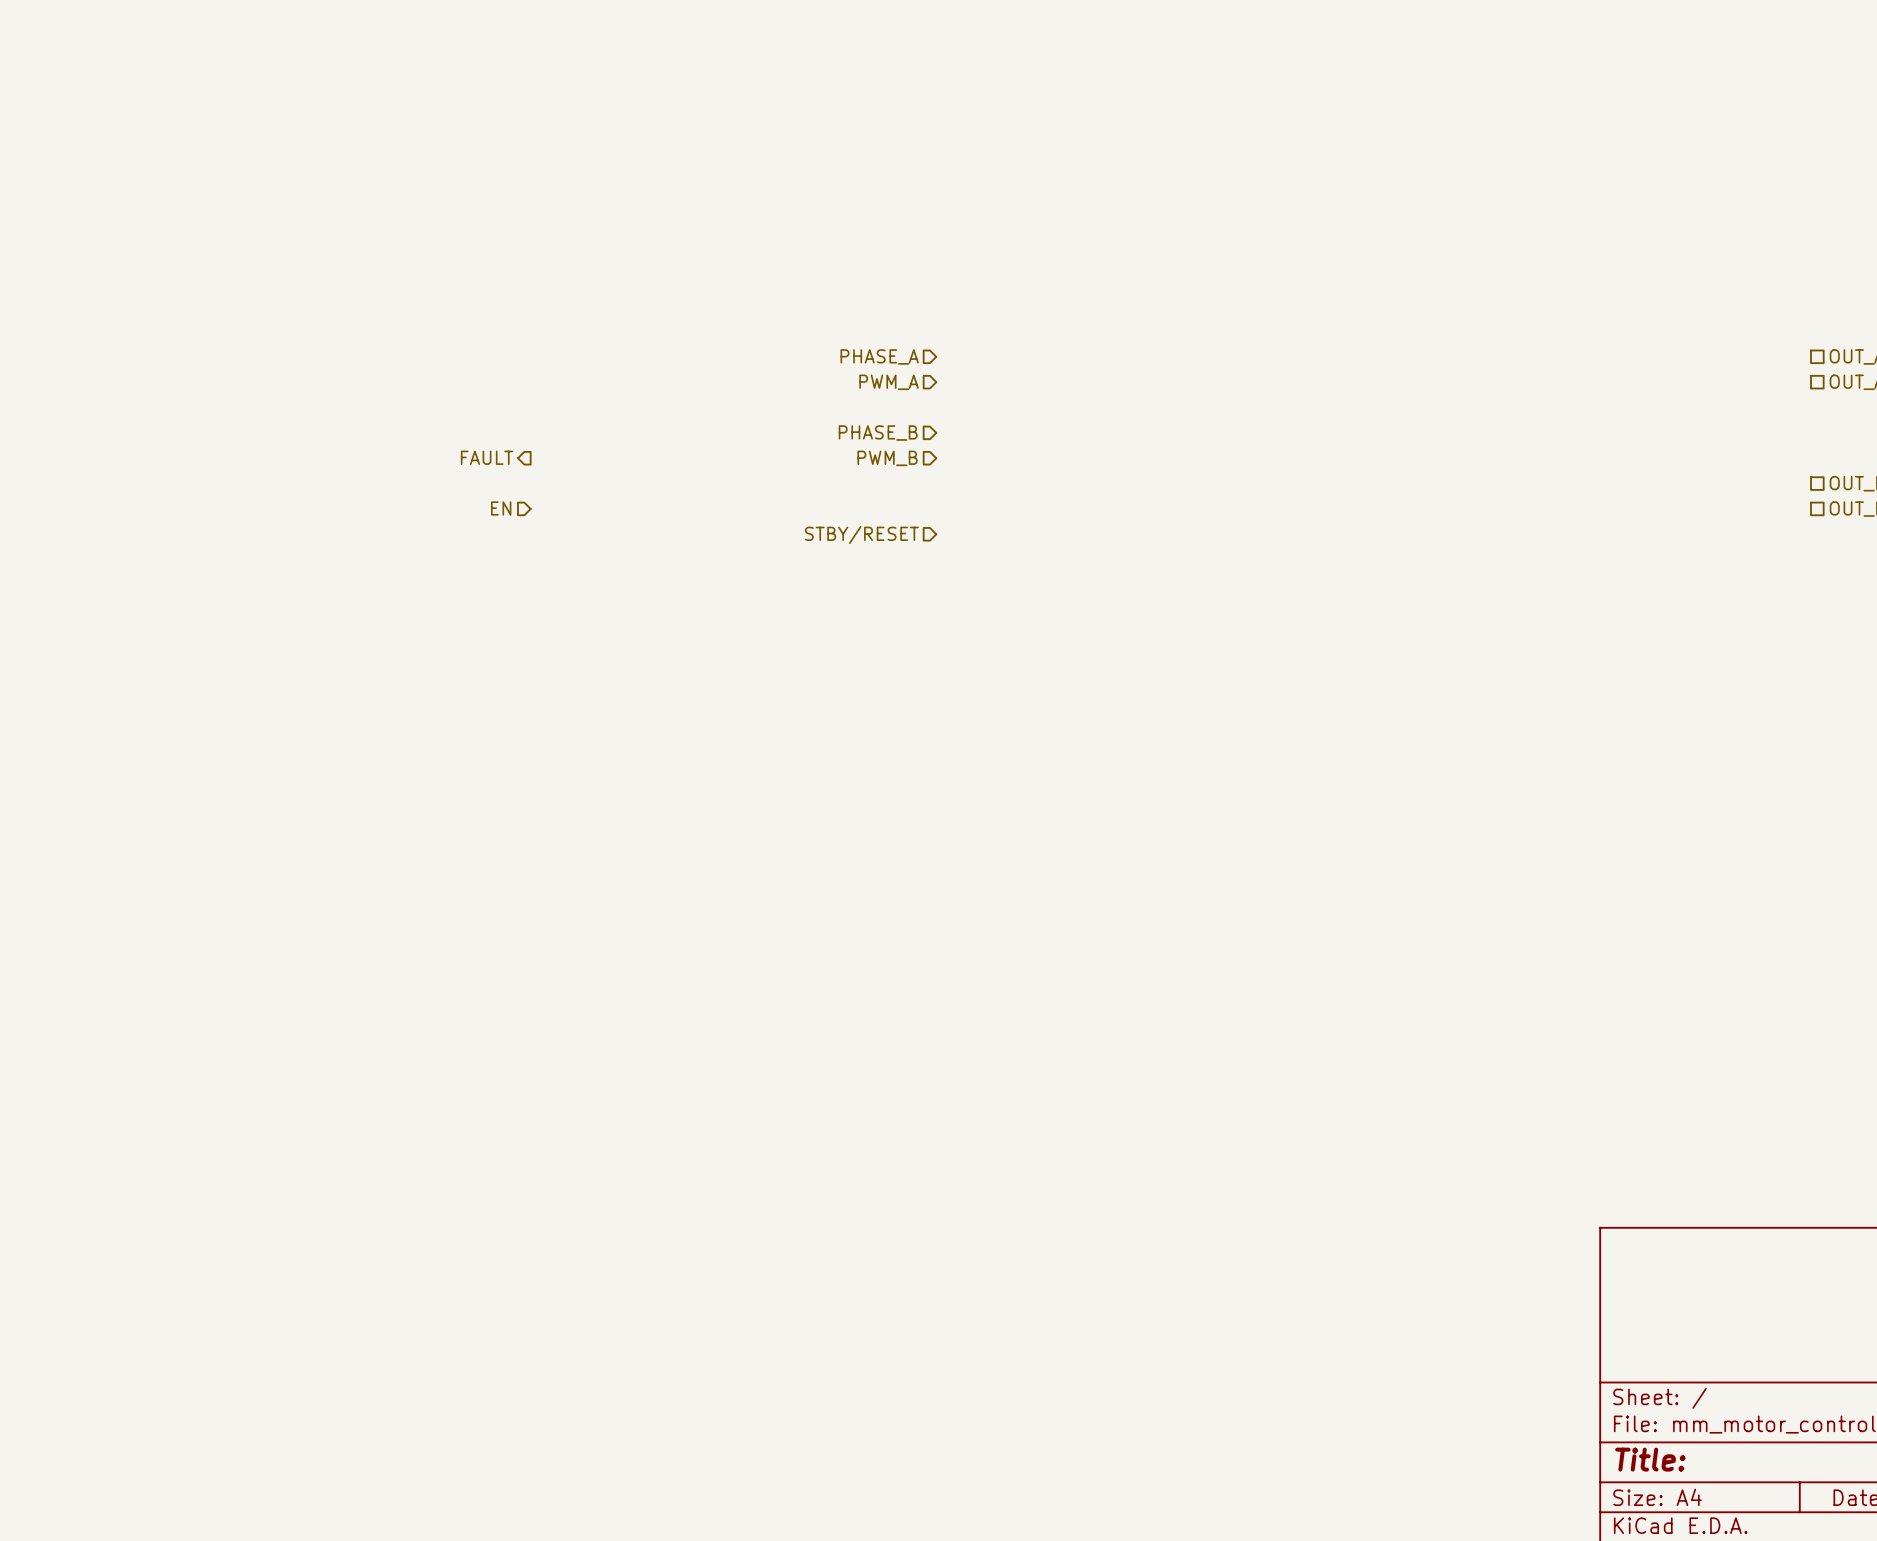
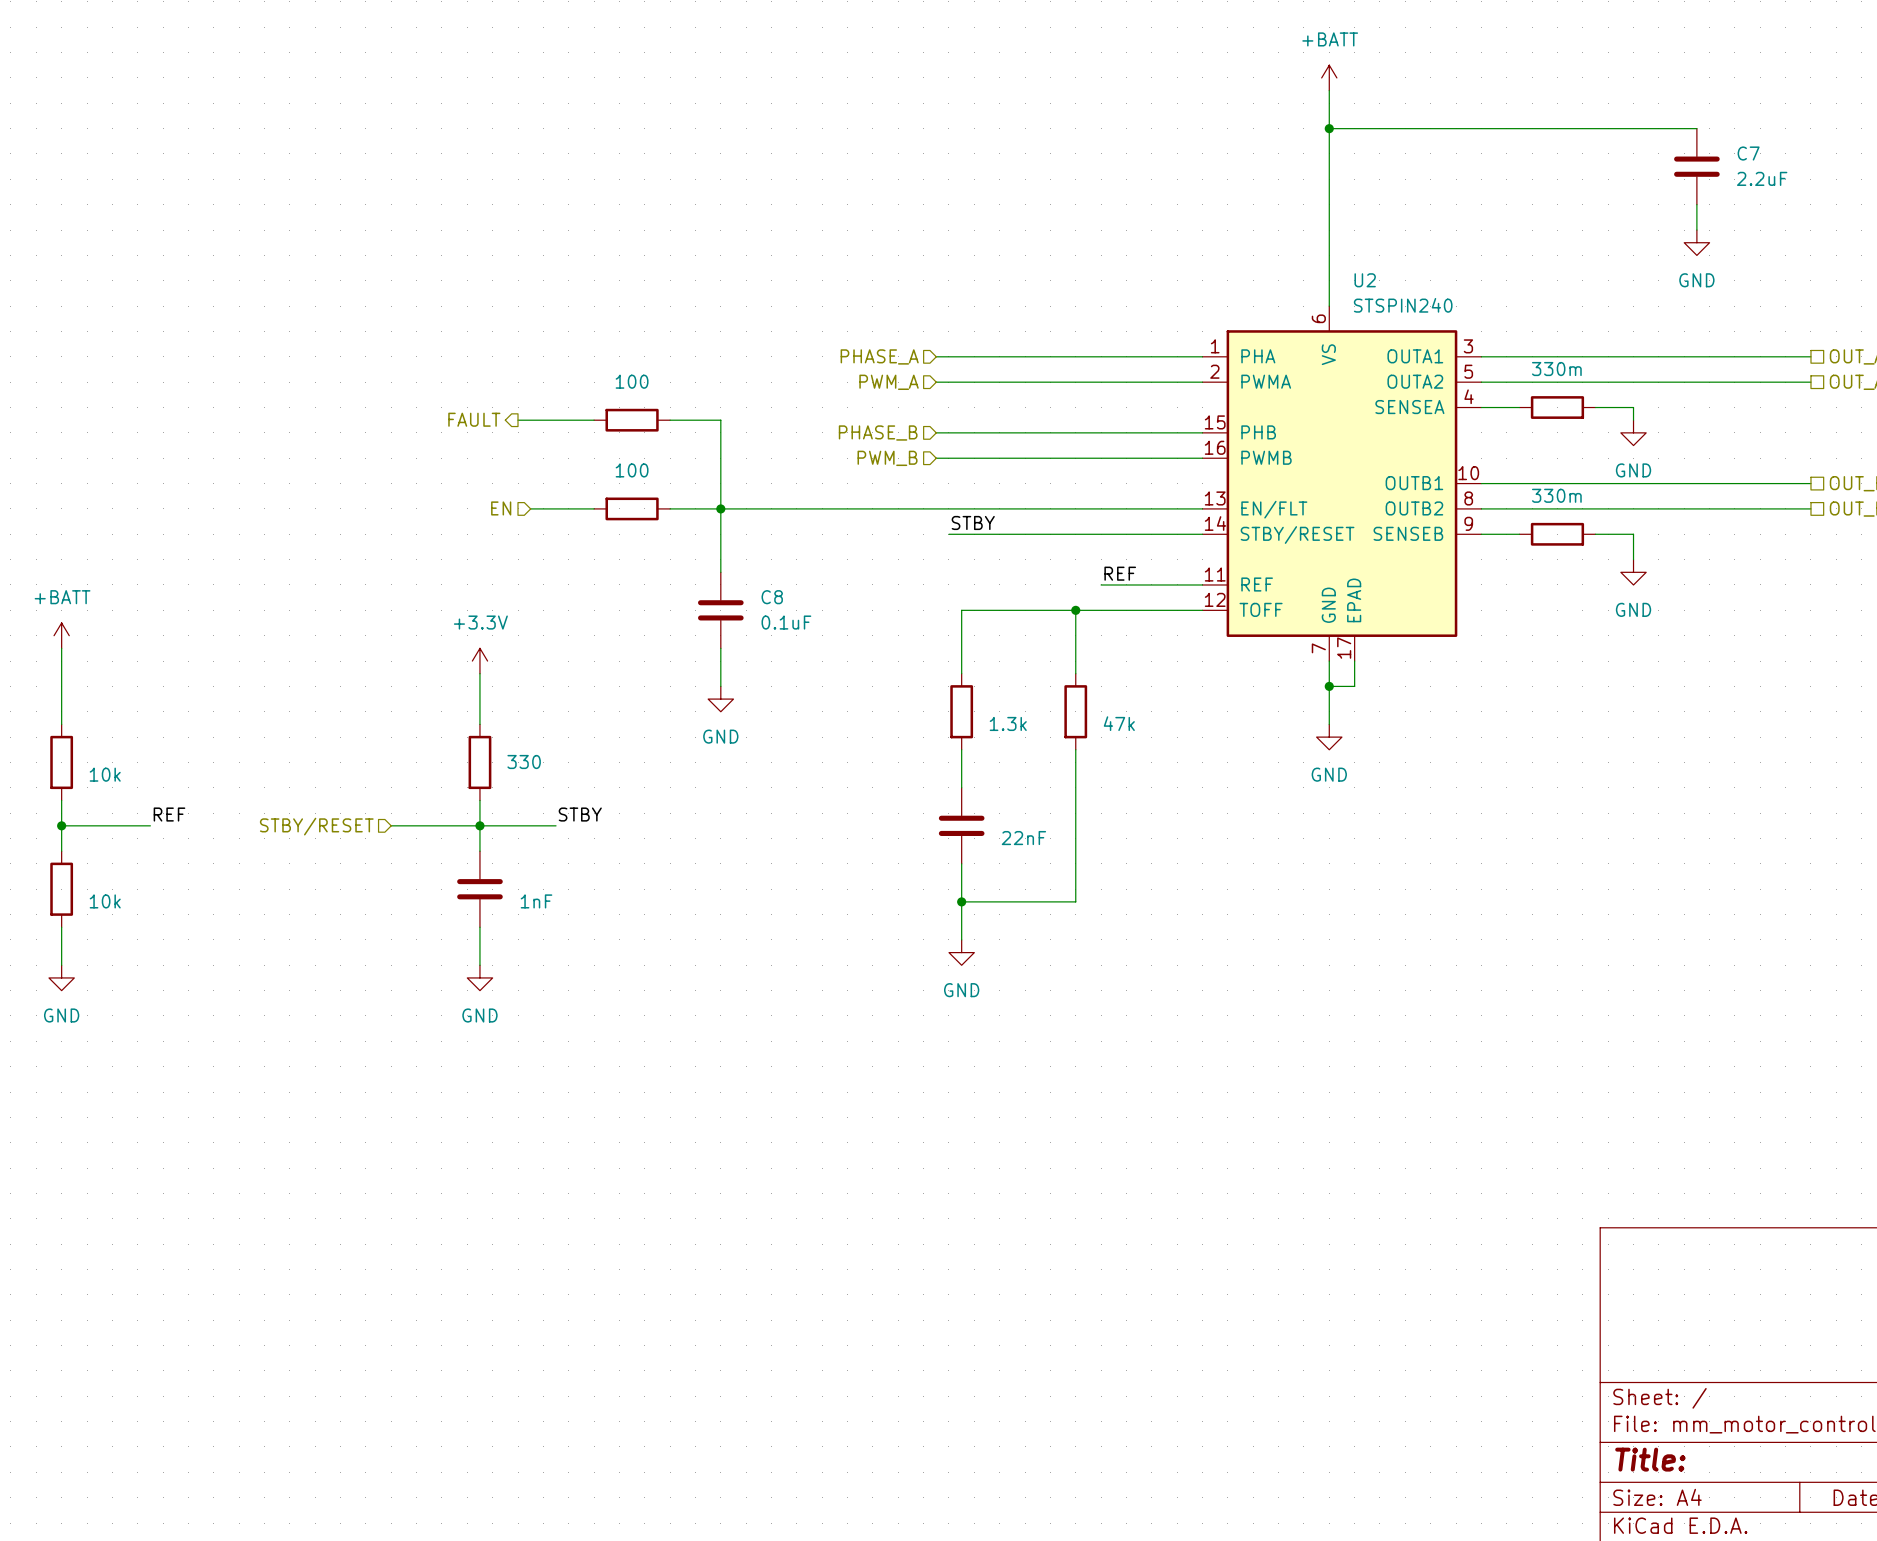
power symbol: none -> +BATT (1329, 77)
wire: none -> (1329, 90) (1329, 306)
wire: none -> (1329, 128) (1696, 128)
junction: none -> (1329, 128)
C7: none -> 2.2uF (1696, 166)
wire: none -> (1696, 204) (1696, 230)
power symbol: none -> GND (1696, 242)
wire: none -> (936, 356) (1202, 356)
wire: none -> (1481, 356) (1810, 356)
wire: none -> (936, 382) (1202, 382)
wire: none -> (1481, 382) (1810, 382)
wire: none -> (1481, 407) (1519, 407)
part: none -> 330m (1557, 407)
wire: none -> (1595, 407) (1633, 407) (1633, 420)
wire: none -> (518, 420) (594, 420)
part: none -> 100 (632, 420)
wire: none -> (670, 420) (720, 420) (720, 572)
wire: none -> (936, 432) (1202, 432)
power symbol: none -> GND (1633, 432)
hierarchical label position: FAULT (487, 457) -> FAULT (474, 419)
wire: none -> (936, 458) (1202, 458)
U2: none -> STSPIN240 (1341, 483)
wire: none -> (1481, 483) (1810, 483)
wire: none -> (530, 508) (594, 508)
part: none -> 100 (632, 508)
wire: none -> (670, 508) (1202, 508)
junction: none -> (720, 508)
wire: none -> (1481, 508) (1810, 508)
label: none -> STBY (973, 522)
wire: none -> (948, 534) (1202, 534)
wire: none -> (1481, 534) (1519, 534)
part: none -> 330m (1557, 534)
wire: none -> (1595, 534) (1633, 534) (1633, 559)
hierarchical label: STBY/RESET (861, 535) -> none
power symbol: none -> GND (1633, 572)
label: none -> REF (1120, 573)
wire: none -> (1101, 584) (1202, 584)
C8: none -> 0.1uF (720, 610)
wire: none -> (1075, 610) (1075, 673)
junction: none -> (1075, 610)
wire: none -> (1202, 610) (961, 610) (961, 673)
power symbol: none -> +BATT (61, 635)
wire: none -> (61, 648) (61, 724)
wire: none -> (720, 648) (720, 686)
power symbol: none -> +3.3V (479, 661)
wire: none -> (1329, 661) (1329, 724)
wire: none -> (1354, 661) (1354, 686) (1329, 686)
wire: none -> (479, 673) (479, 724)
junction: none -> (1329, 686)
power symbol: none -> GND (720, 699)
part: none -> 1.3k (961, 711)
part: none -> 47k (1075, 711)
power symbol: none -> GND (1329, 737)
wire: none -> (961, 749) (961, 787)
wire: none -> (1075, 749) (1075, 901) (961, 901)
part: none -> 10k (61, 762)
part: none -> 330 (479, 762)
wire: none -> (61, 800) (61, 851)
wire: none -> (479, 800) (479, 851)
label: none -> REF (169, 814)
label: none -> STBY (580, 814)
wire: none -> (61, 825) (150, 825)
junction: none -> (61, 825)
wire: none -> (391, 825) (556, 825)
junction: none -> (479, 825)
part: none -> 22nF (961, 825)
hierarchical label: none -> STBY/RESET (316, 826)
wire: none -> (961, 863) (961, 939)
part: none -> 10k (61, 889)
part: none -> 1nF (479, 889)
junction: none -> (961, 901)
wire: none -> (61, 927) (61, 965)
wire: none -> (479, 927) (479, 965)
power symbol: none -> GND (961, 952)
power symbol: none -> GND (61, 977)
power symbol: none -> GND (479, 977)

